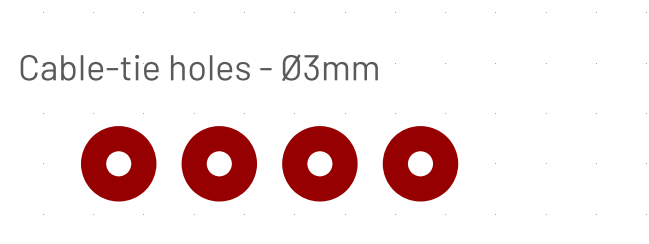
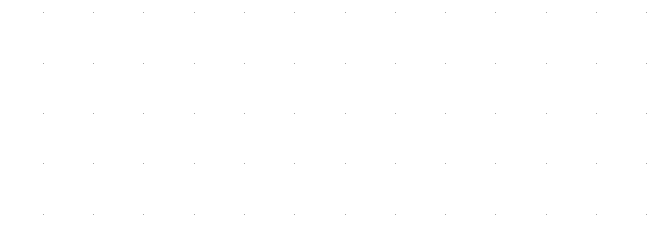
text: Cable-tie holes - Ø3mm (199, 67) -> none
part: (118, 163) -> none
part: (219, 163) -> none
part: (319, 163) -> none
part: (420, 163) -> none

